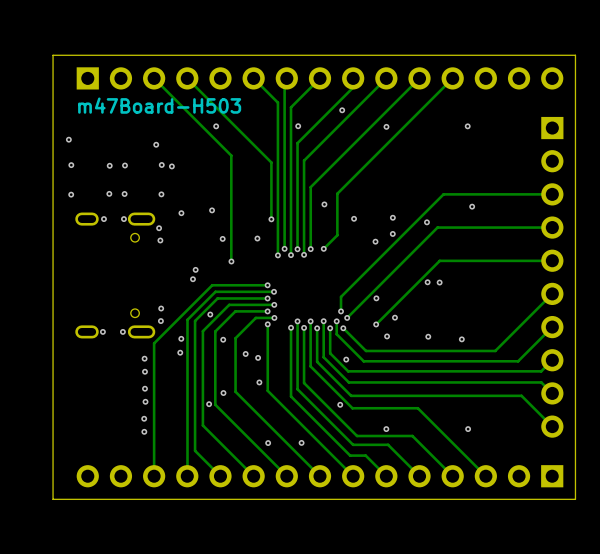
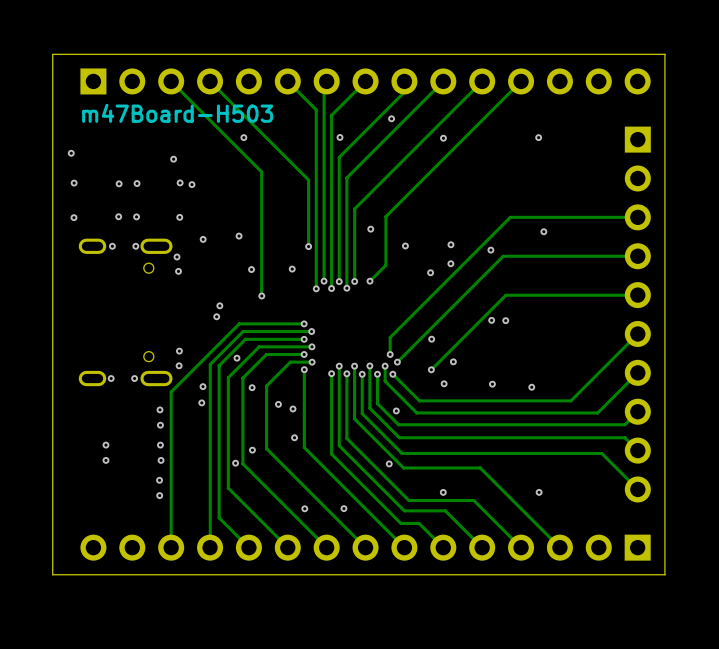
via: none -> (105, 445)
via: none -> (105, 460)

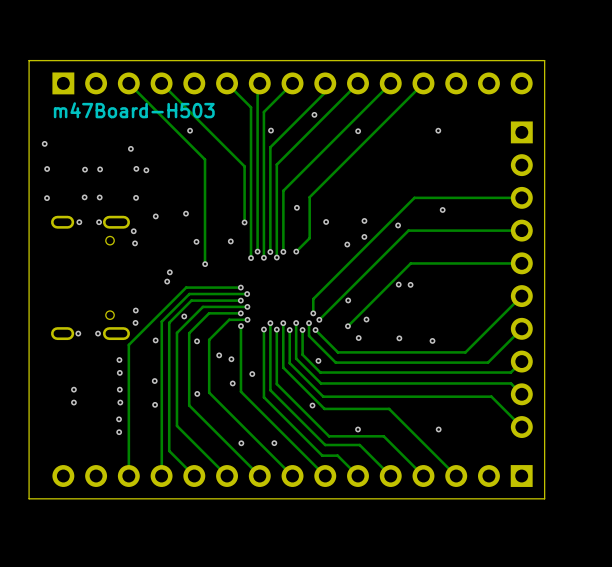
via: (201, 402) -> none
via: none -> (252, 374)
via: none -> (154, 381)
via: none -> (155, 404)
via: (235, 463) -> none

